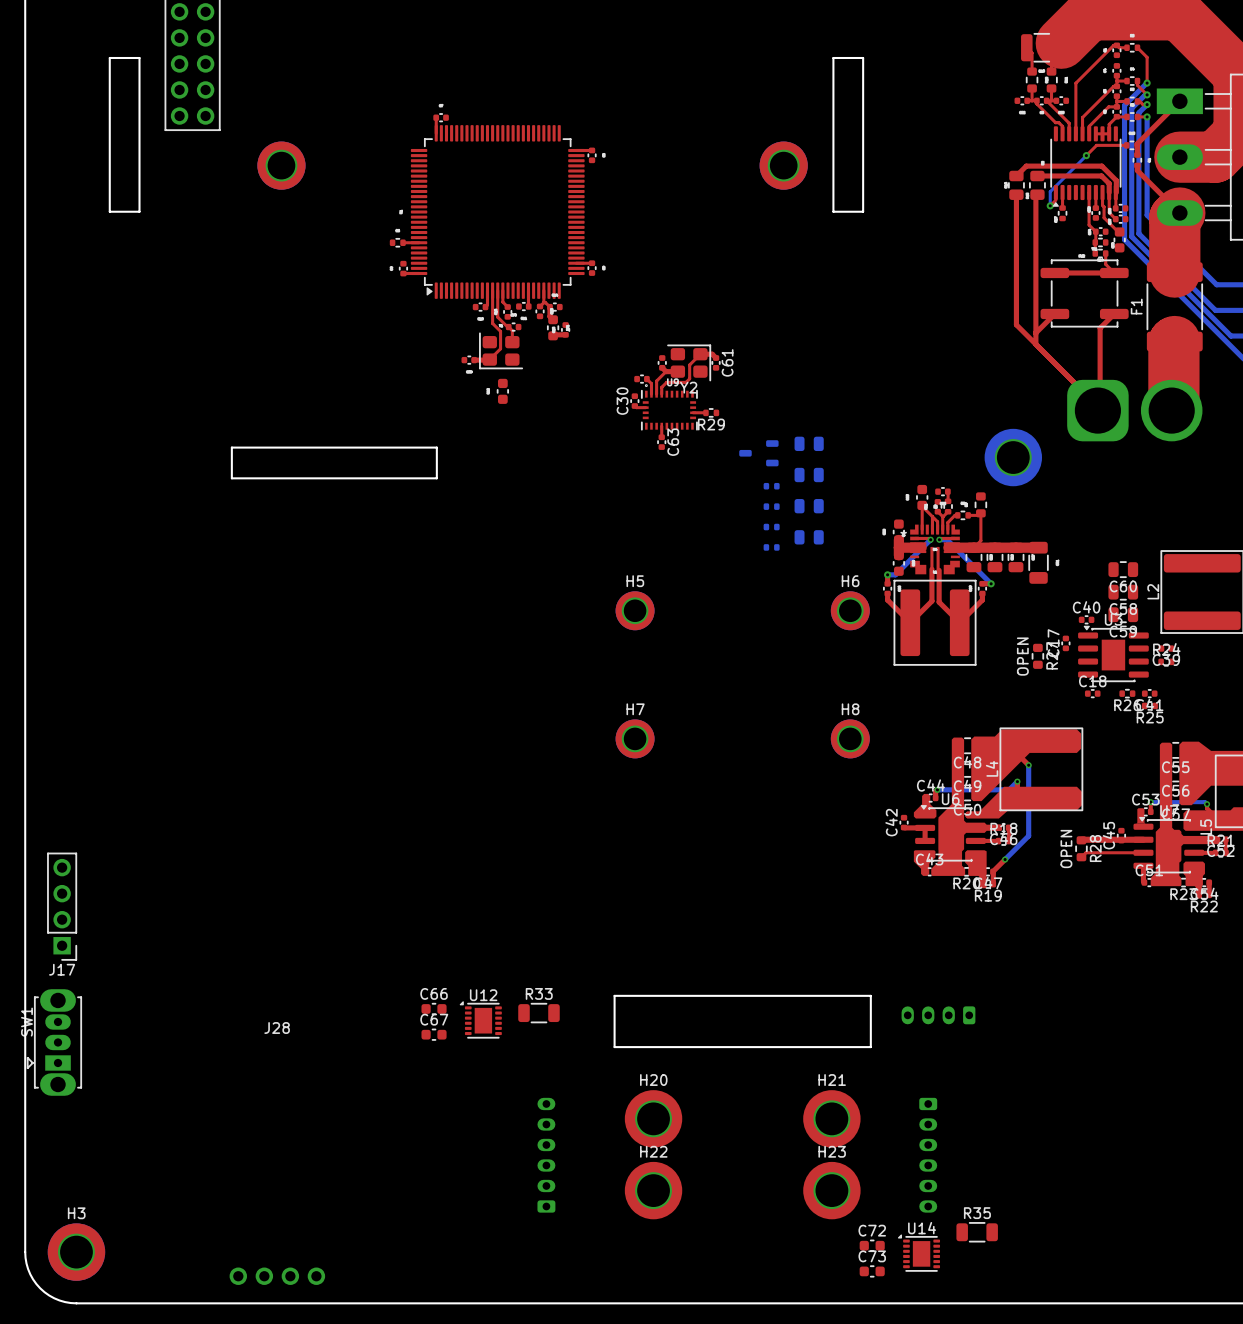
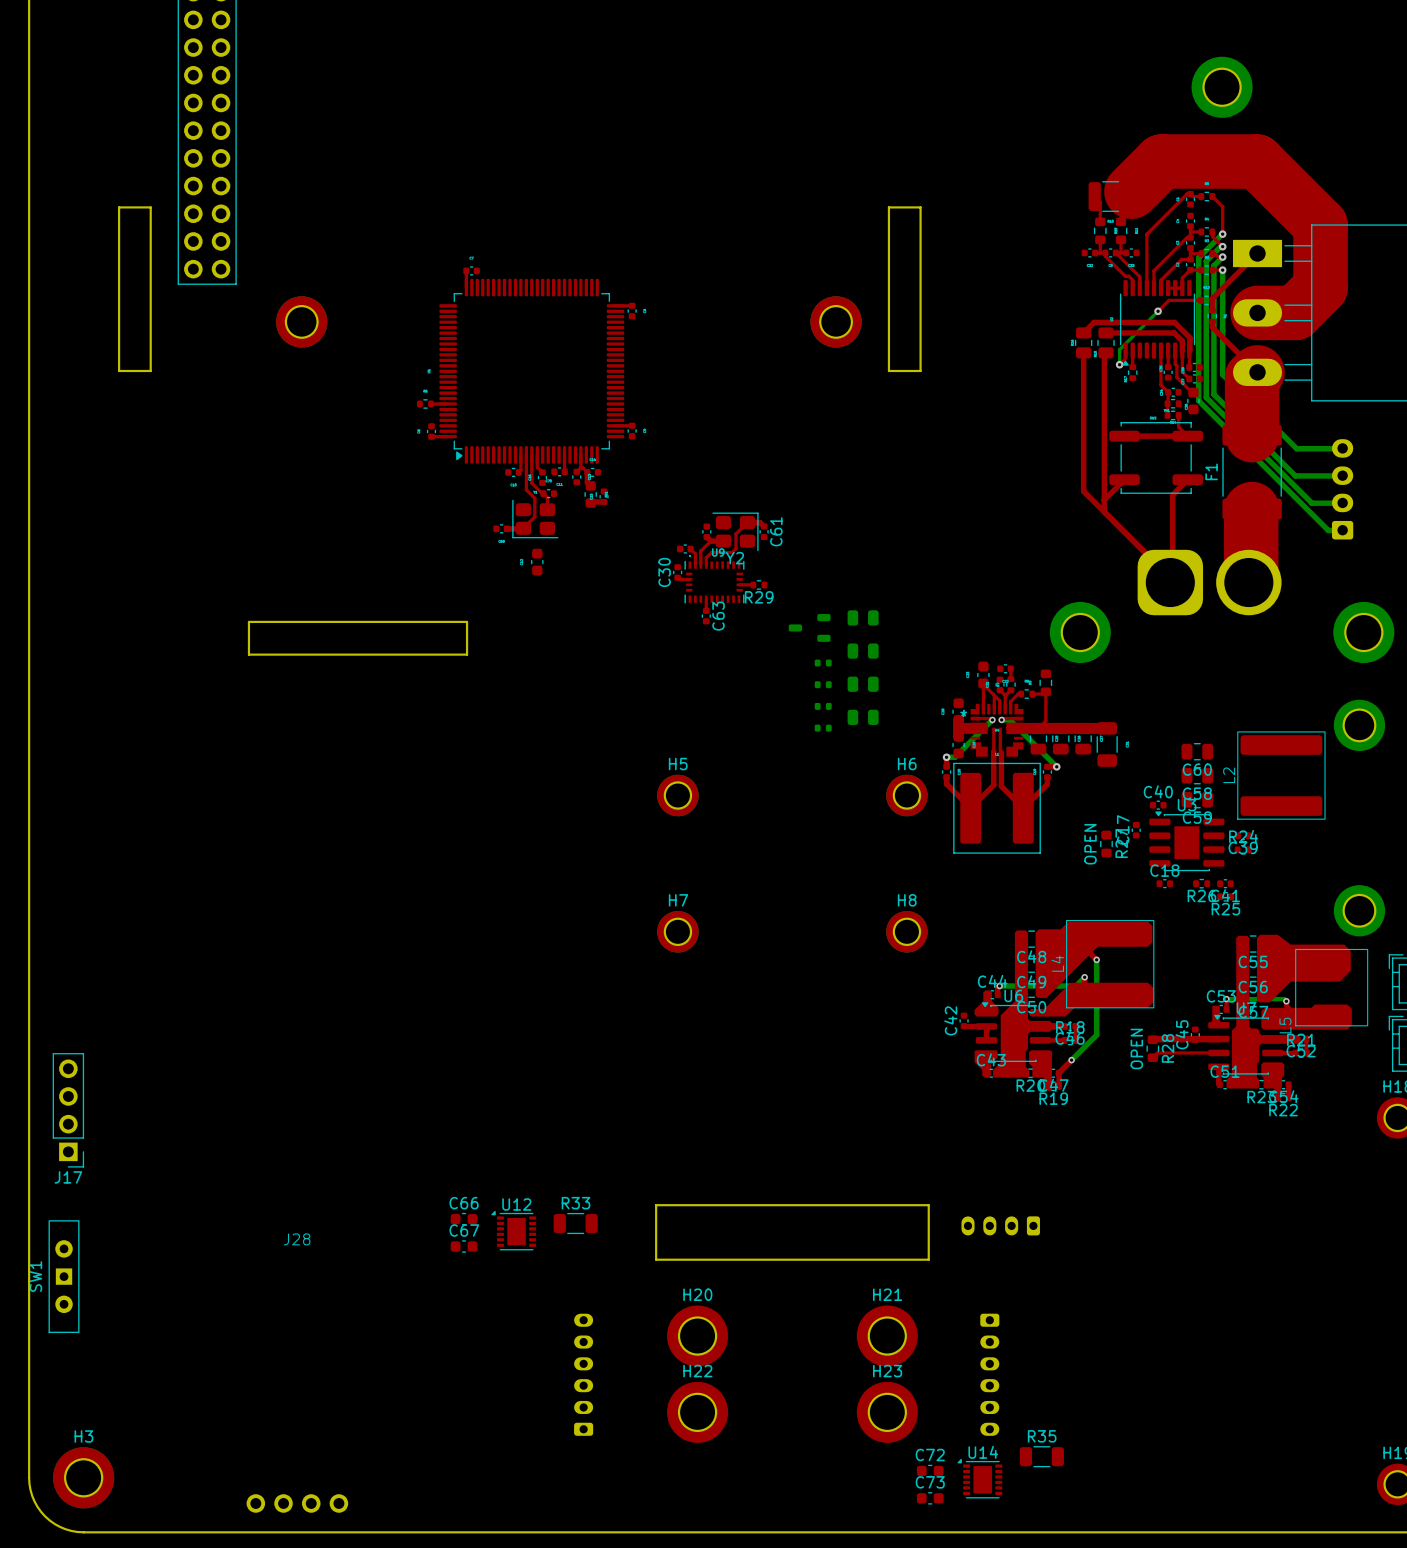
SW1 footprint: [27, 989, 82, 1096] -> [48, 1220, 80, 1333]

